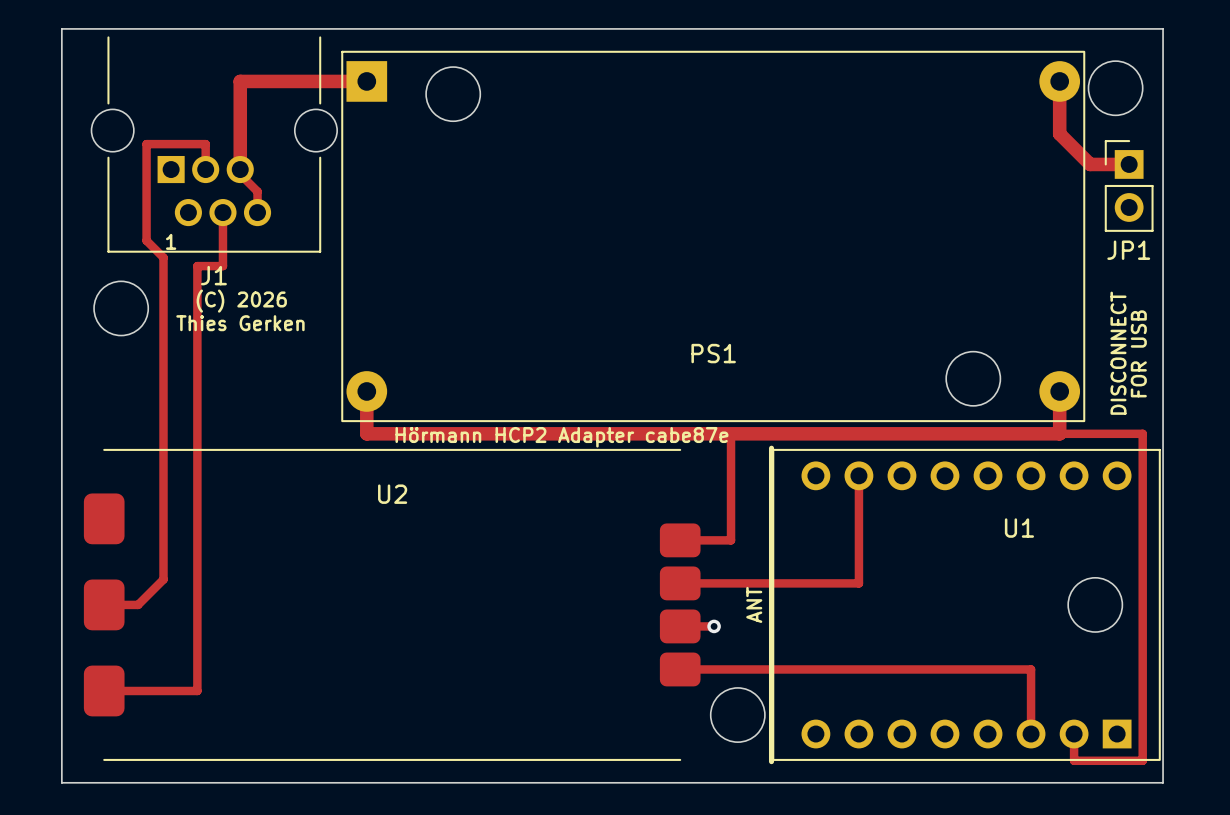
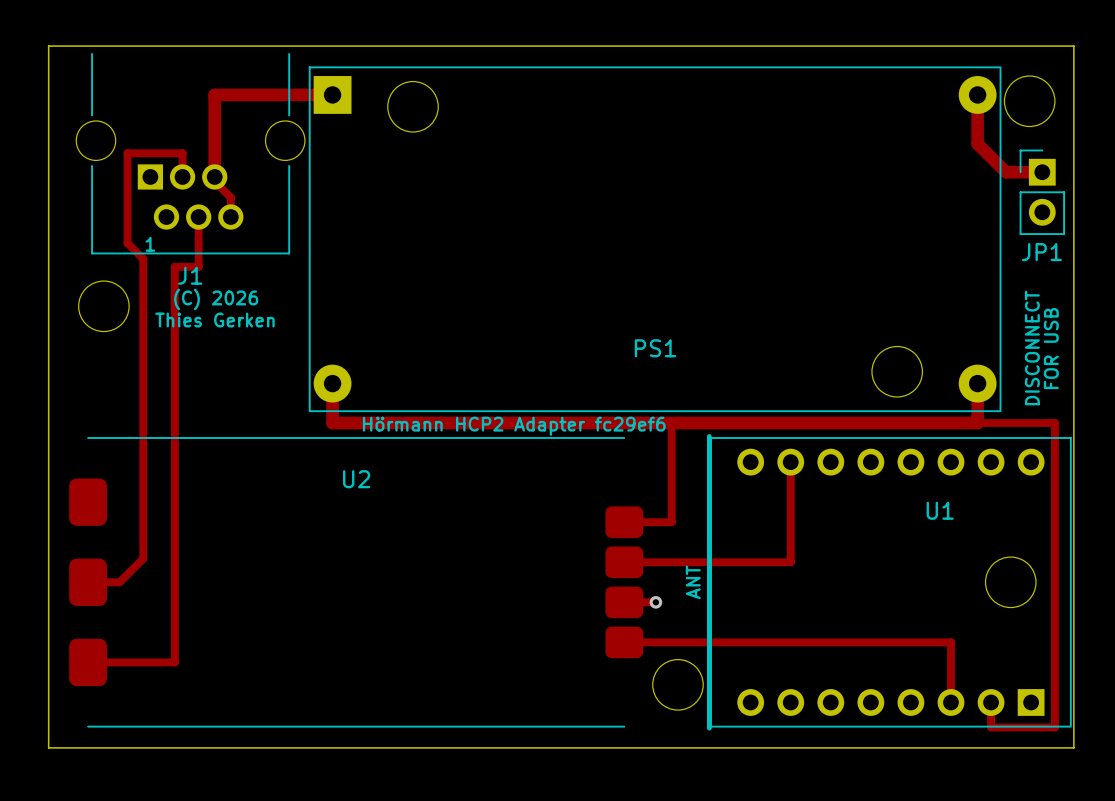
text: Hörmann HCP2 Adapter cabe87e (561, 437) -> Hörmann HCP2 Adapter fc29ef6 (514, 426)

